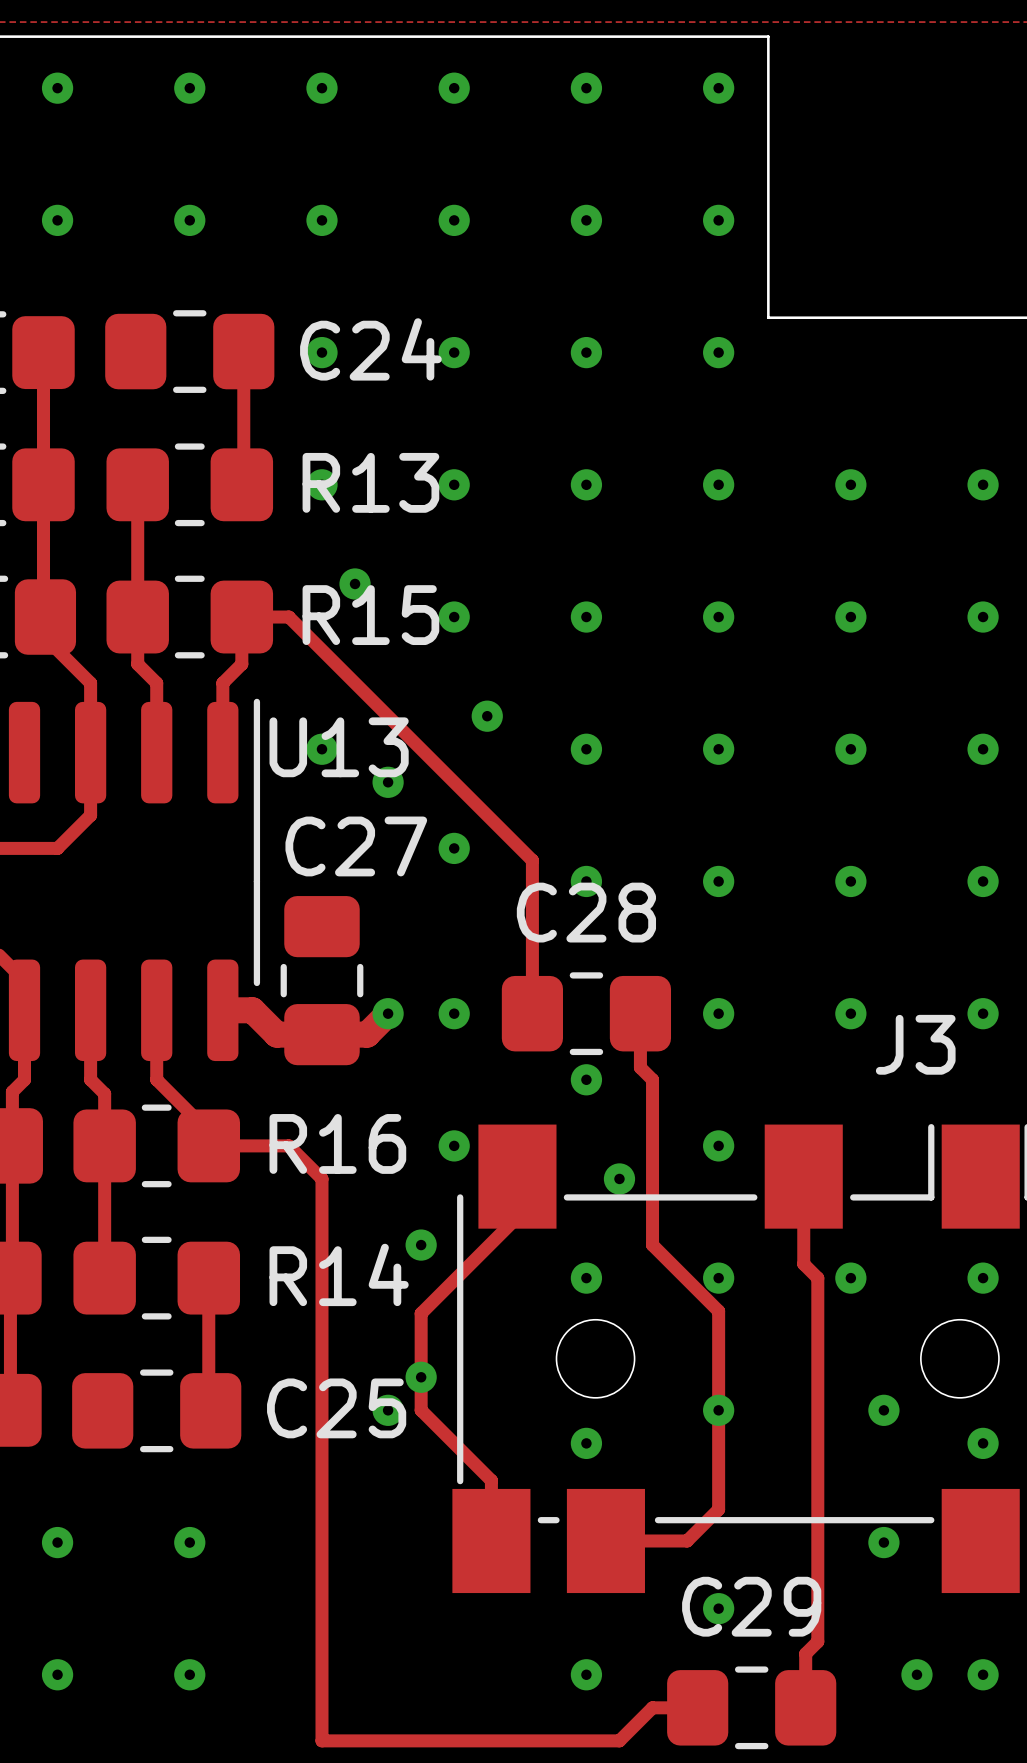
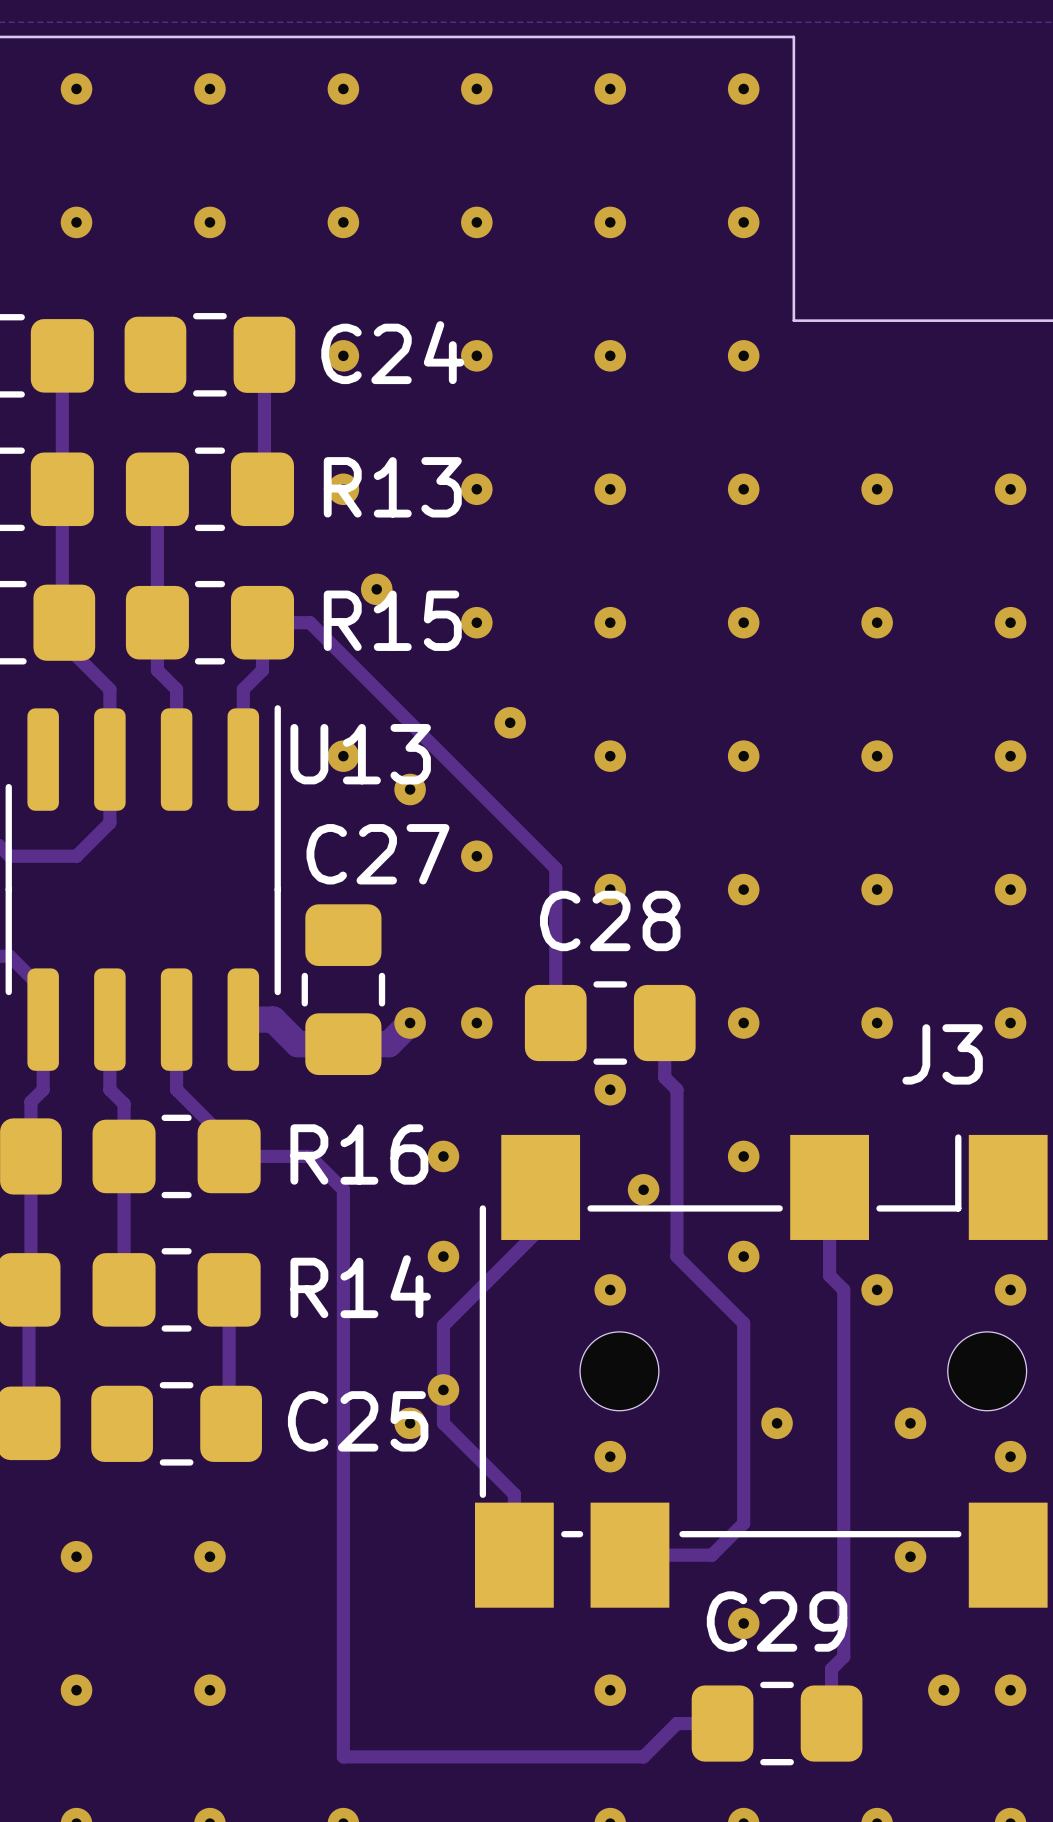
via position: (454, 1145) -> (443, 1156)
via position: (718, 1278) -> (743, 1256)
via position: (718, 1410) -> (777, 1423)

